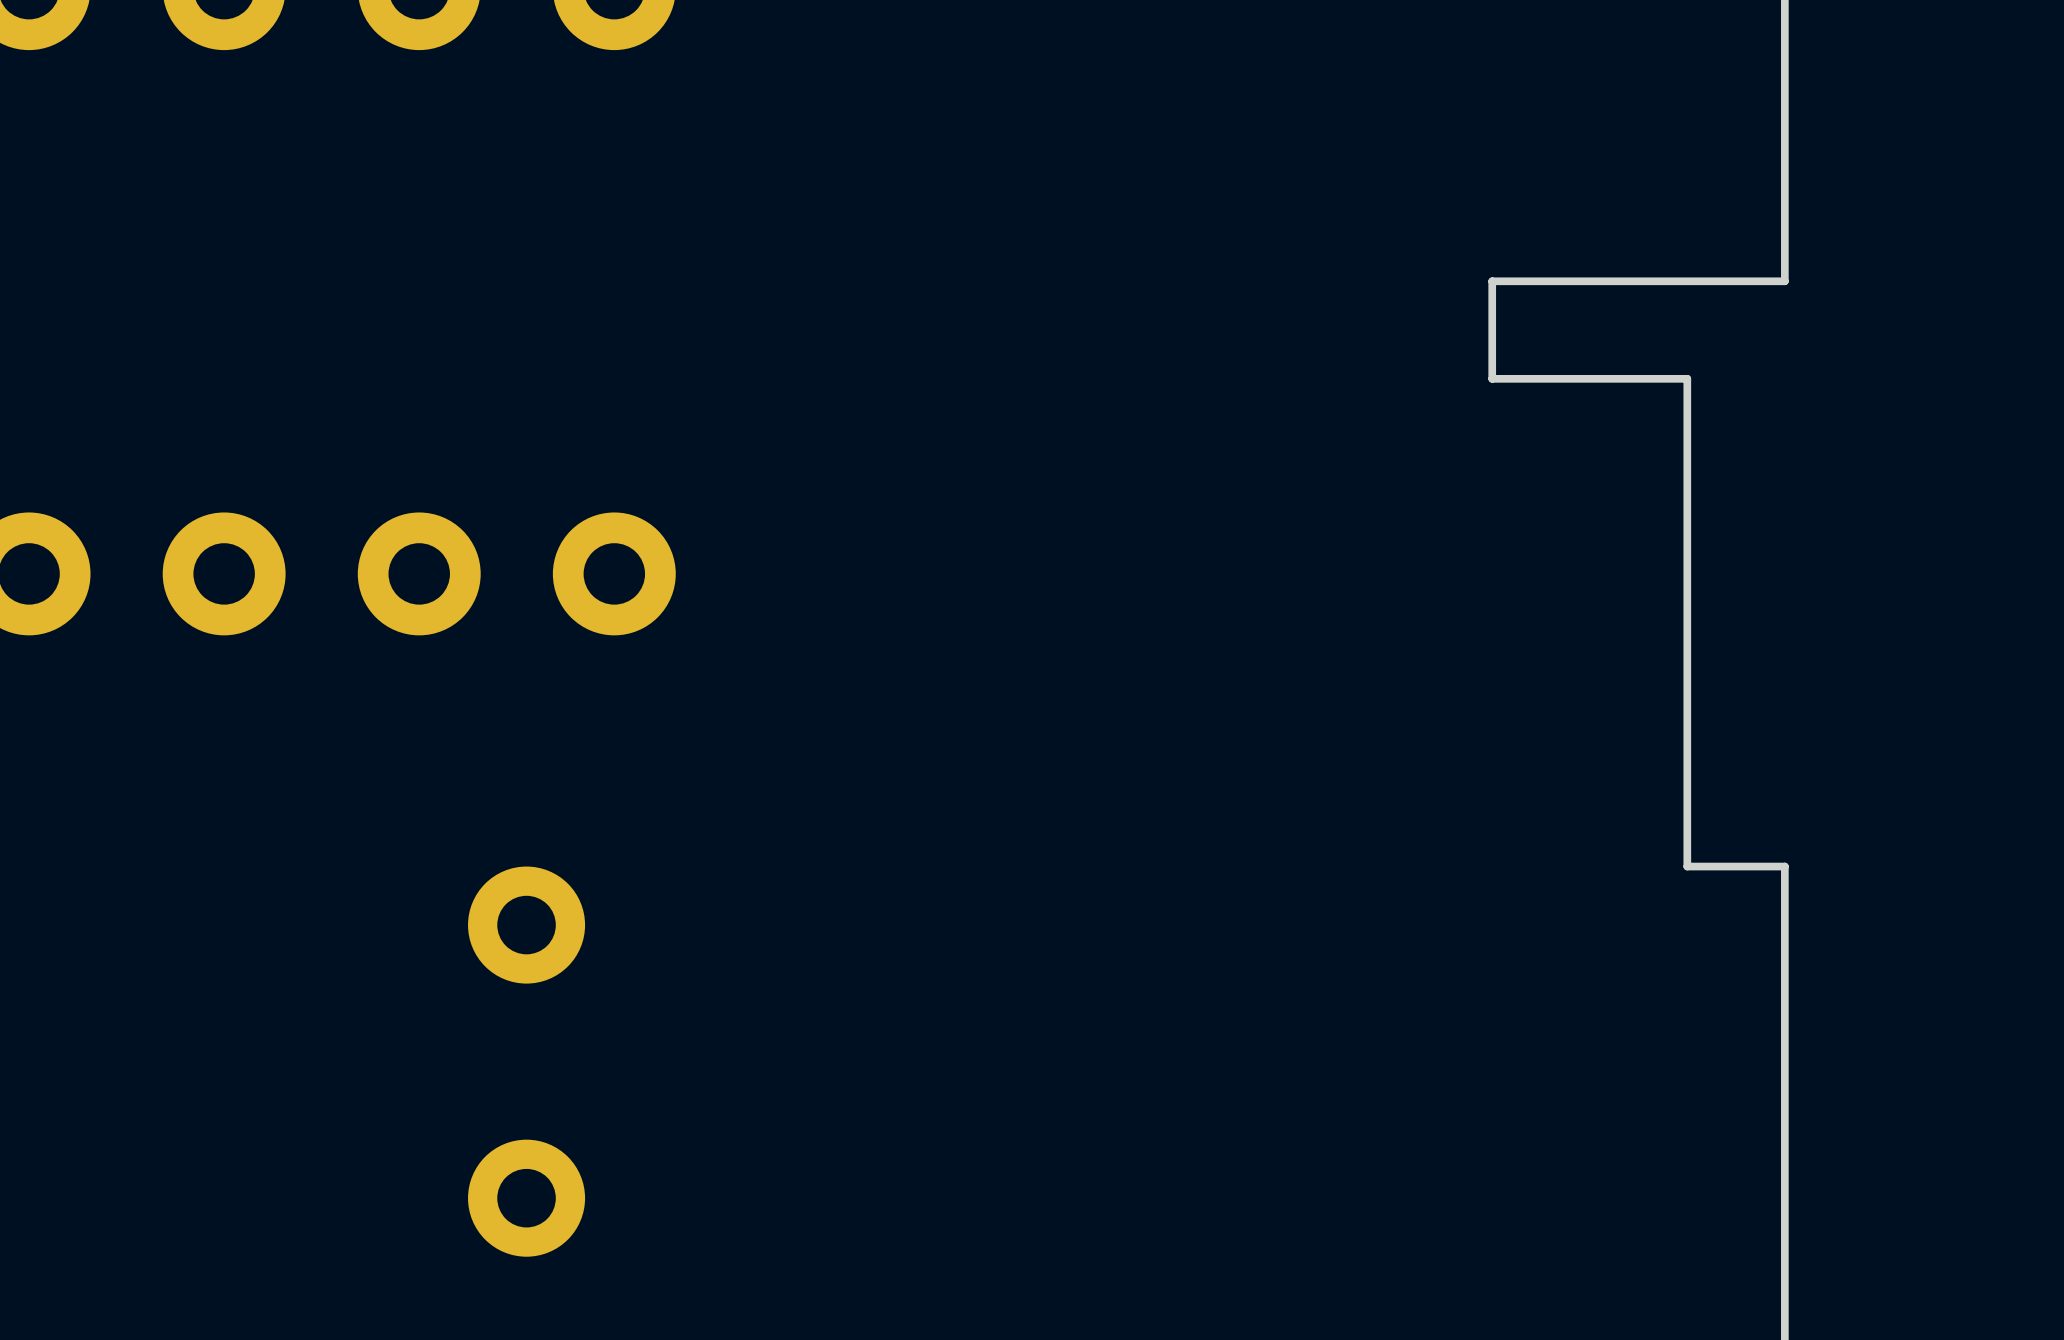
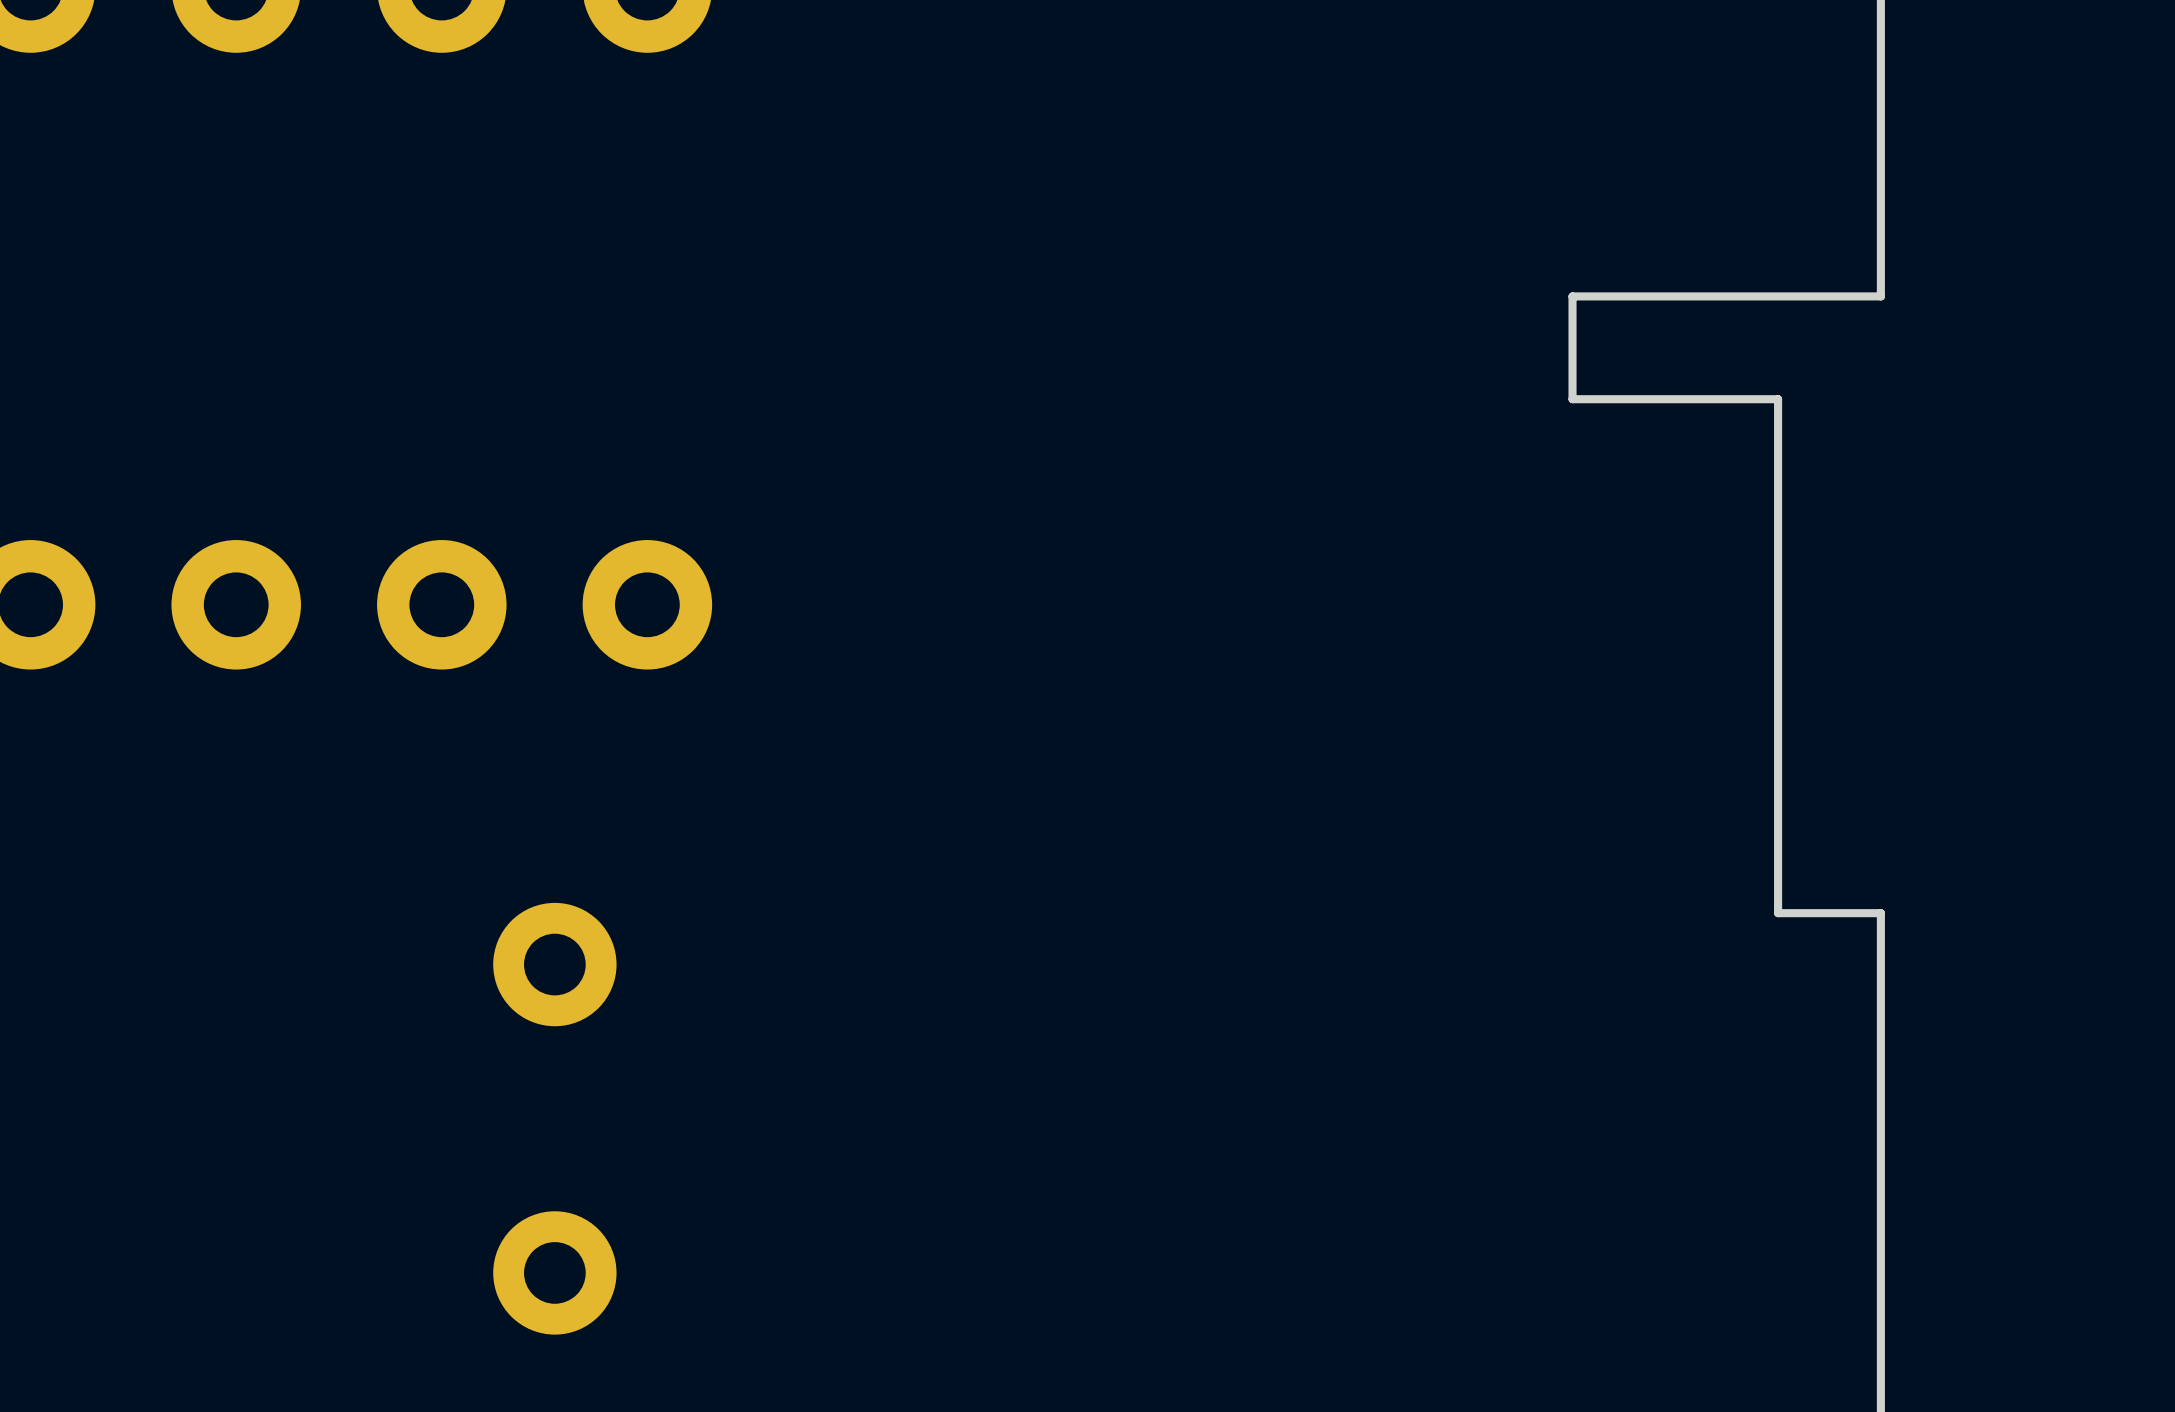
part footprint: [468, 866, 586, 1257] -> [493, 902, 617, 1335]

